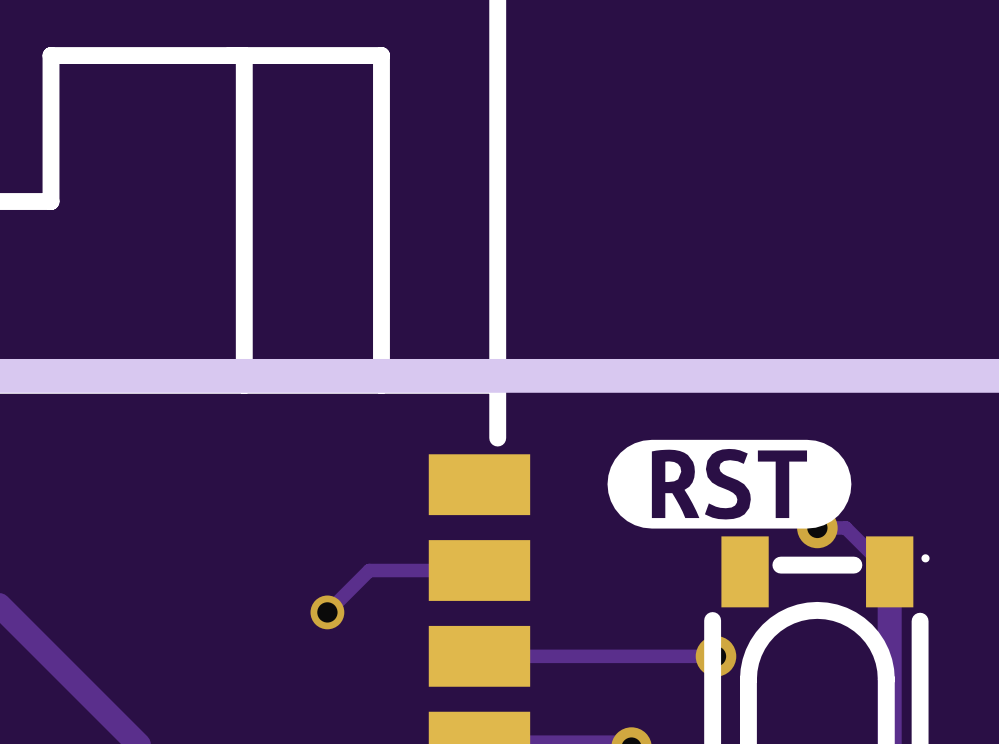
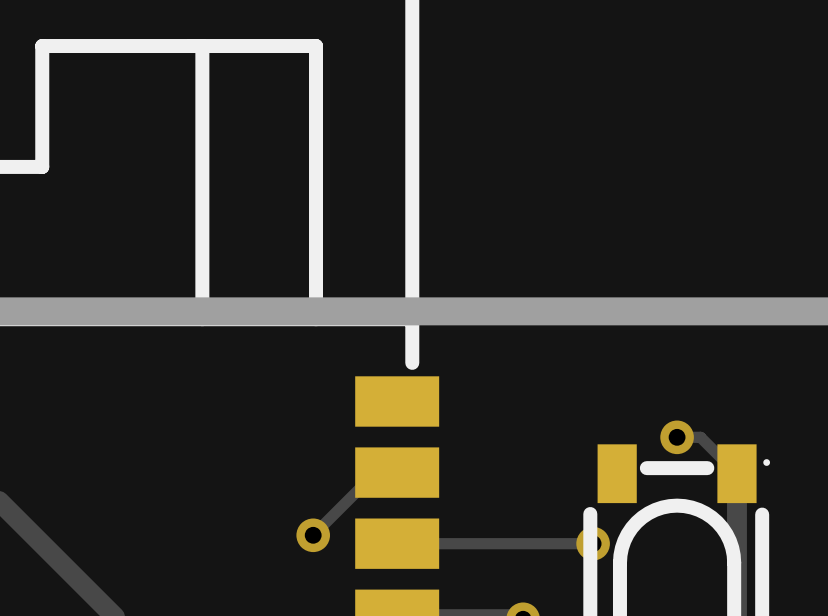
drawing: [607, 439, 852, 529] -> none
track: (453, 570) (369, 570) (327, 612) -> (375, 472) (313, 535)
via: (327, 612) -> none
via: none -> (313, 535)

